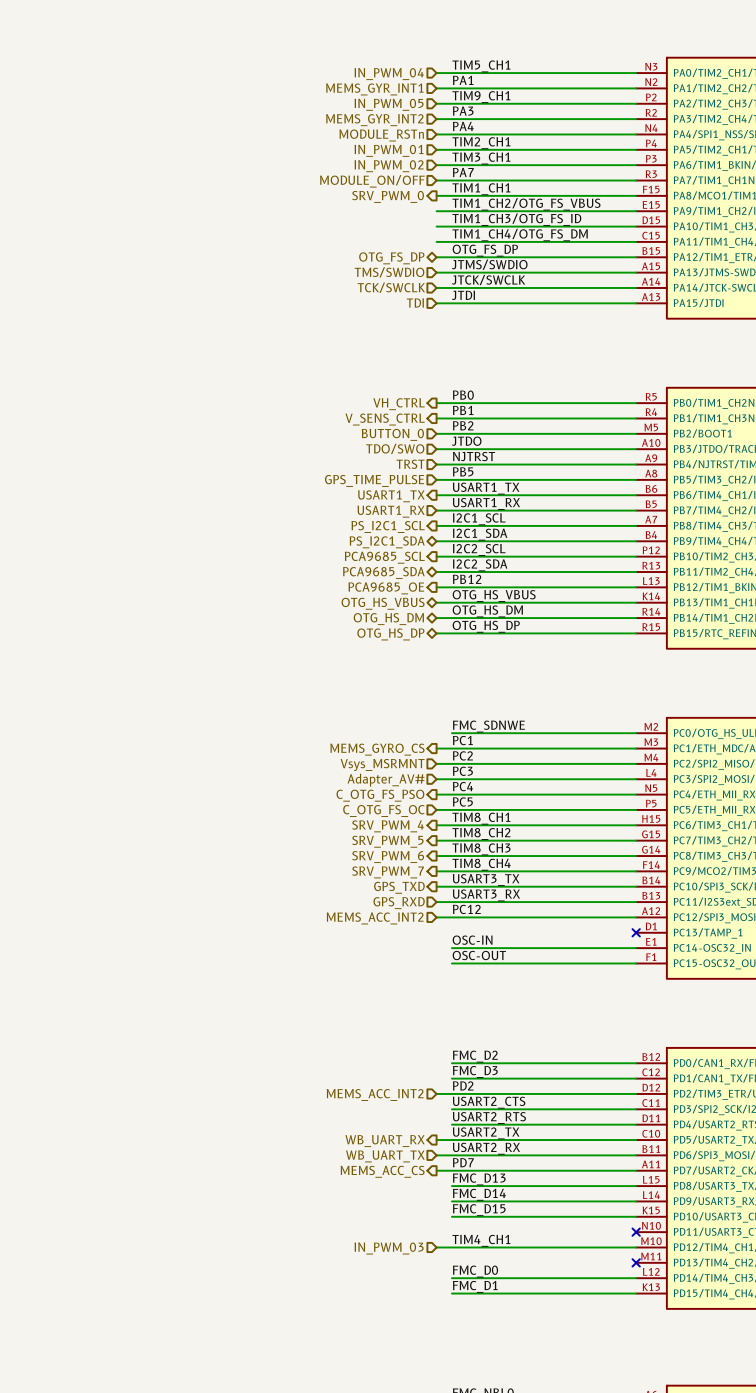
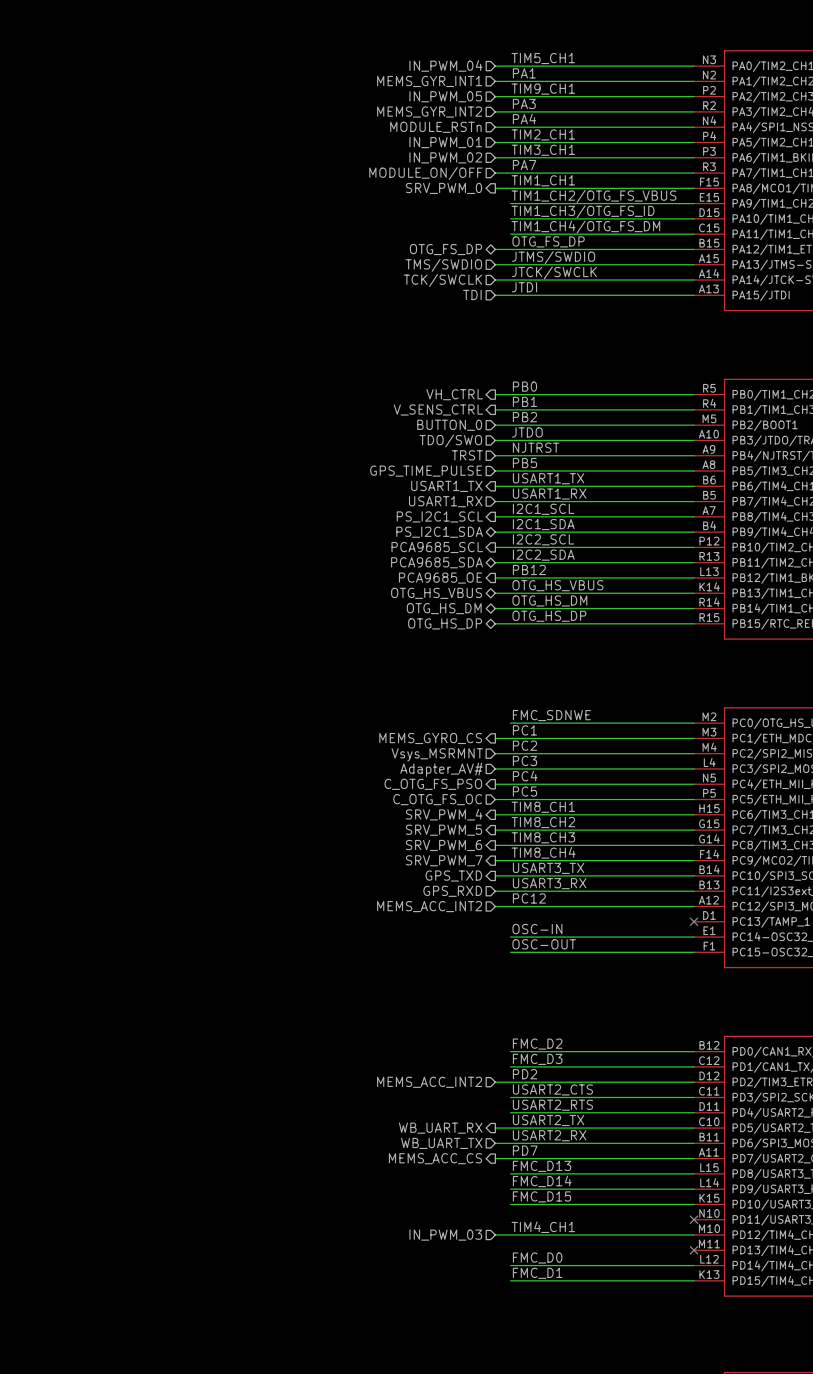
wire: (436, 211) (451, 211) -> none
wire: (436, 226) (451, 226) -> none
wire: (436, 241) (451, 241) -> none

